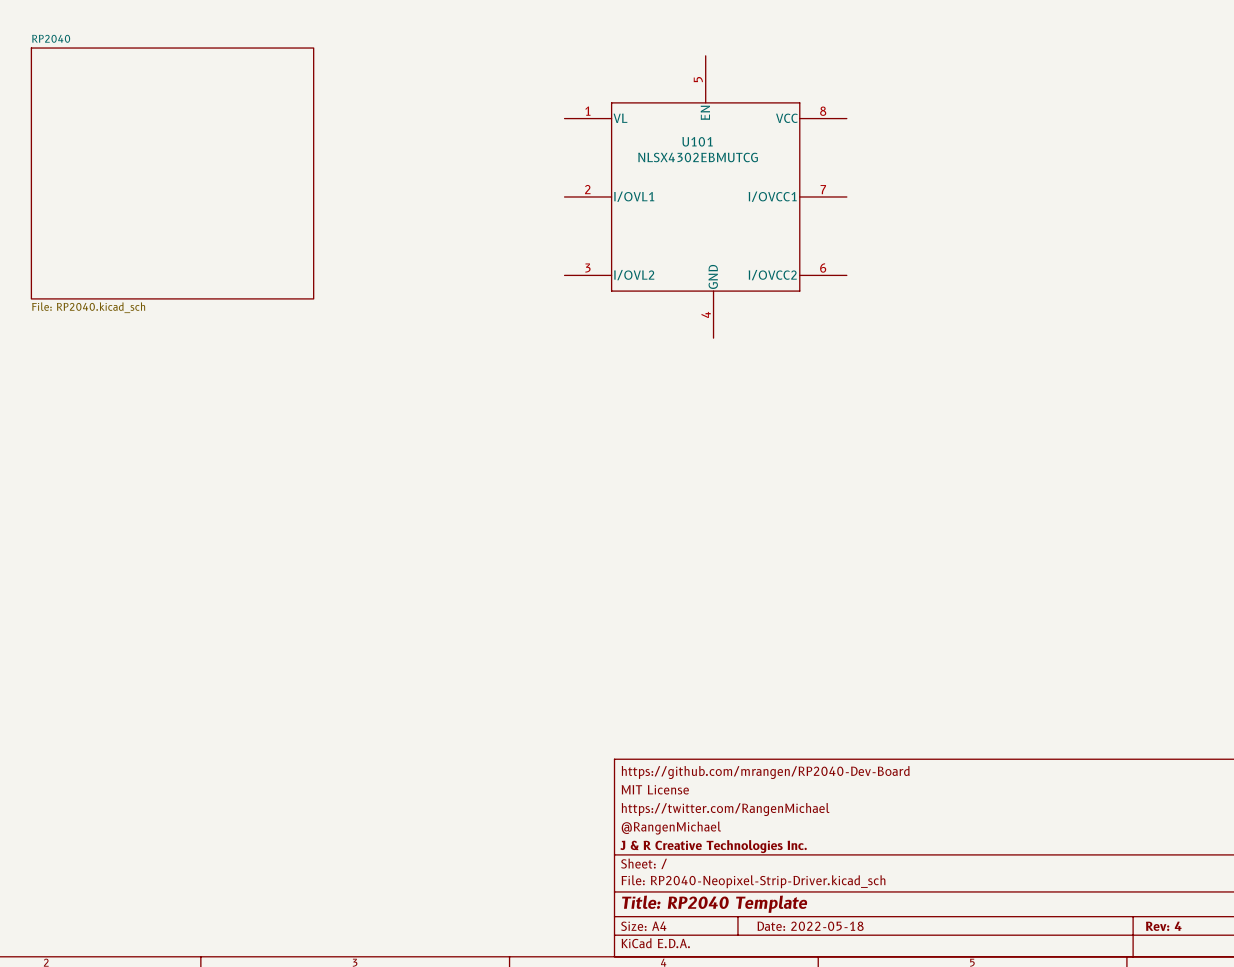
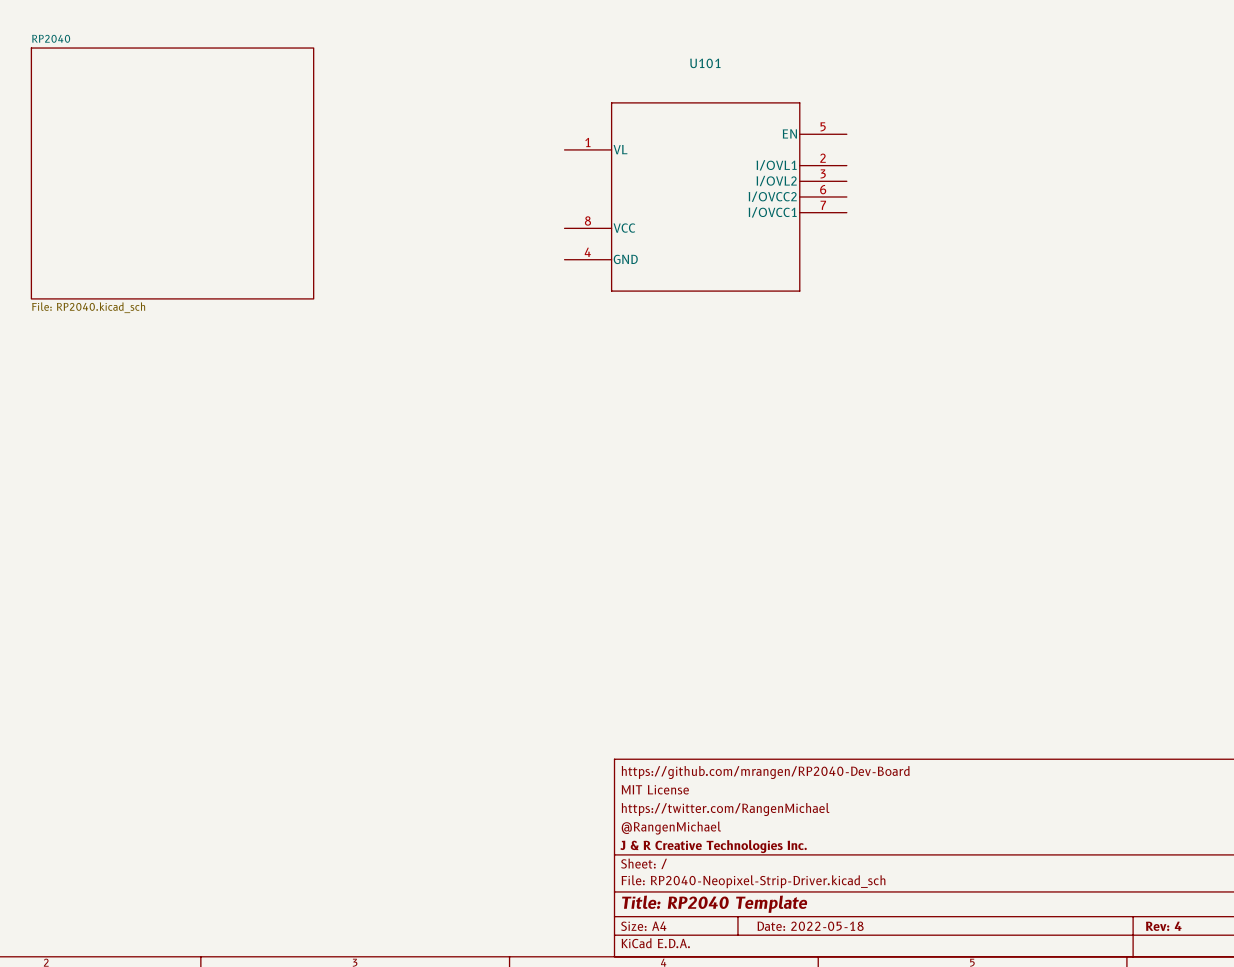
U101 symbol: [564, 55, 847, 339] -> [564, 102, 847, 292]
U101 name position: U101 (697, 141) -> U101 (705, 63)
U101 value: NLSX4302EBMUTCG (698, 157) -> none

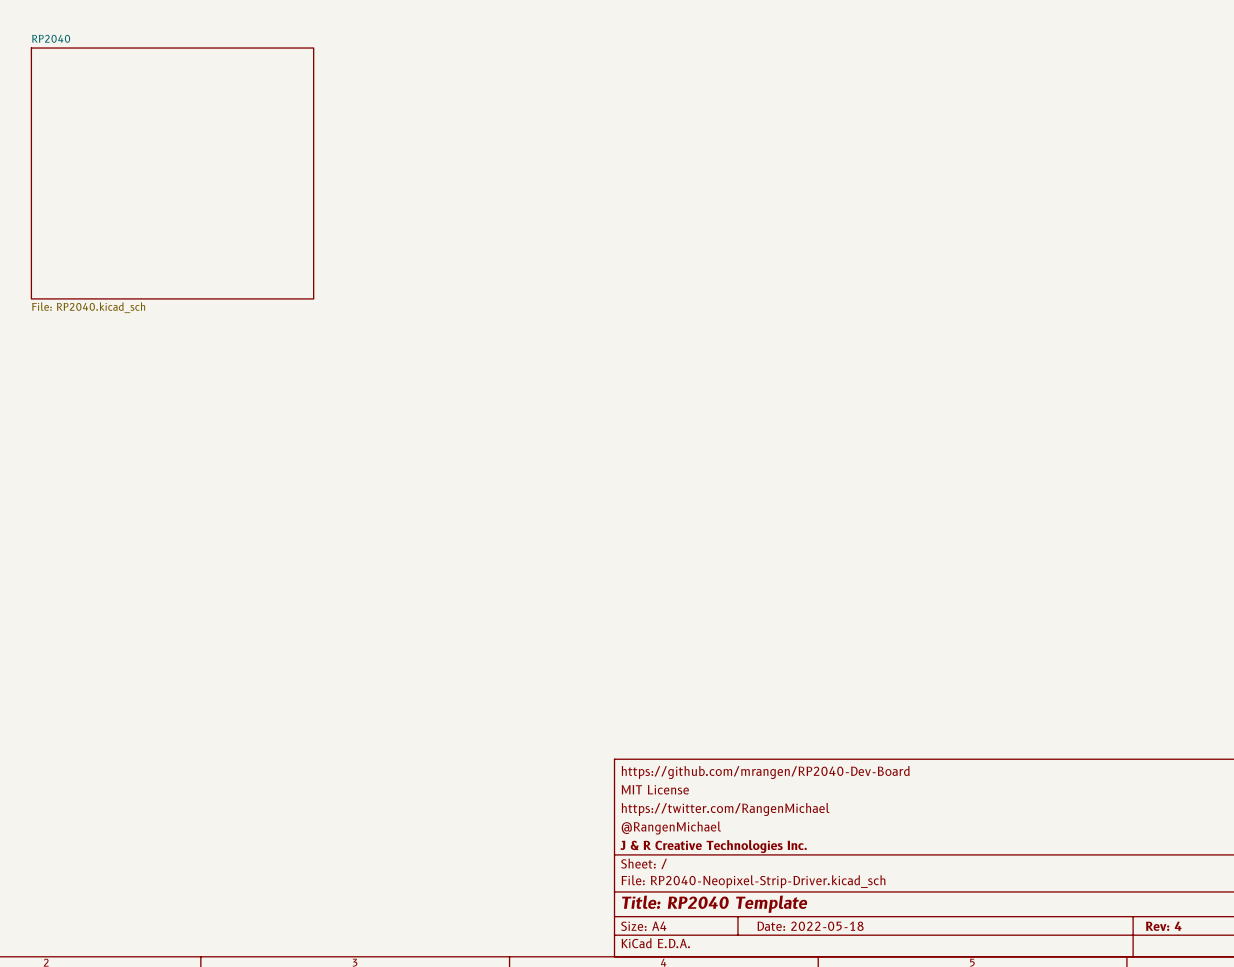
U101: (705, 196) -> none

